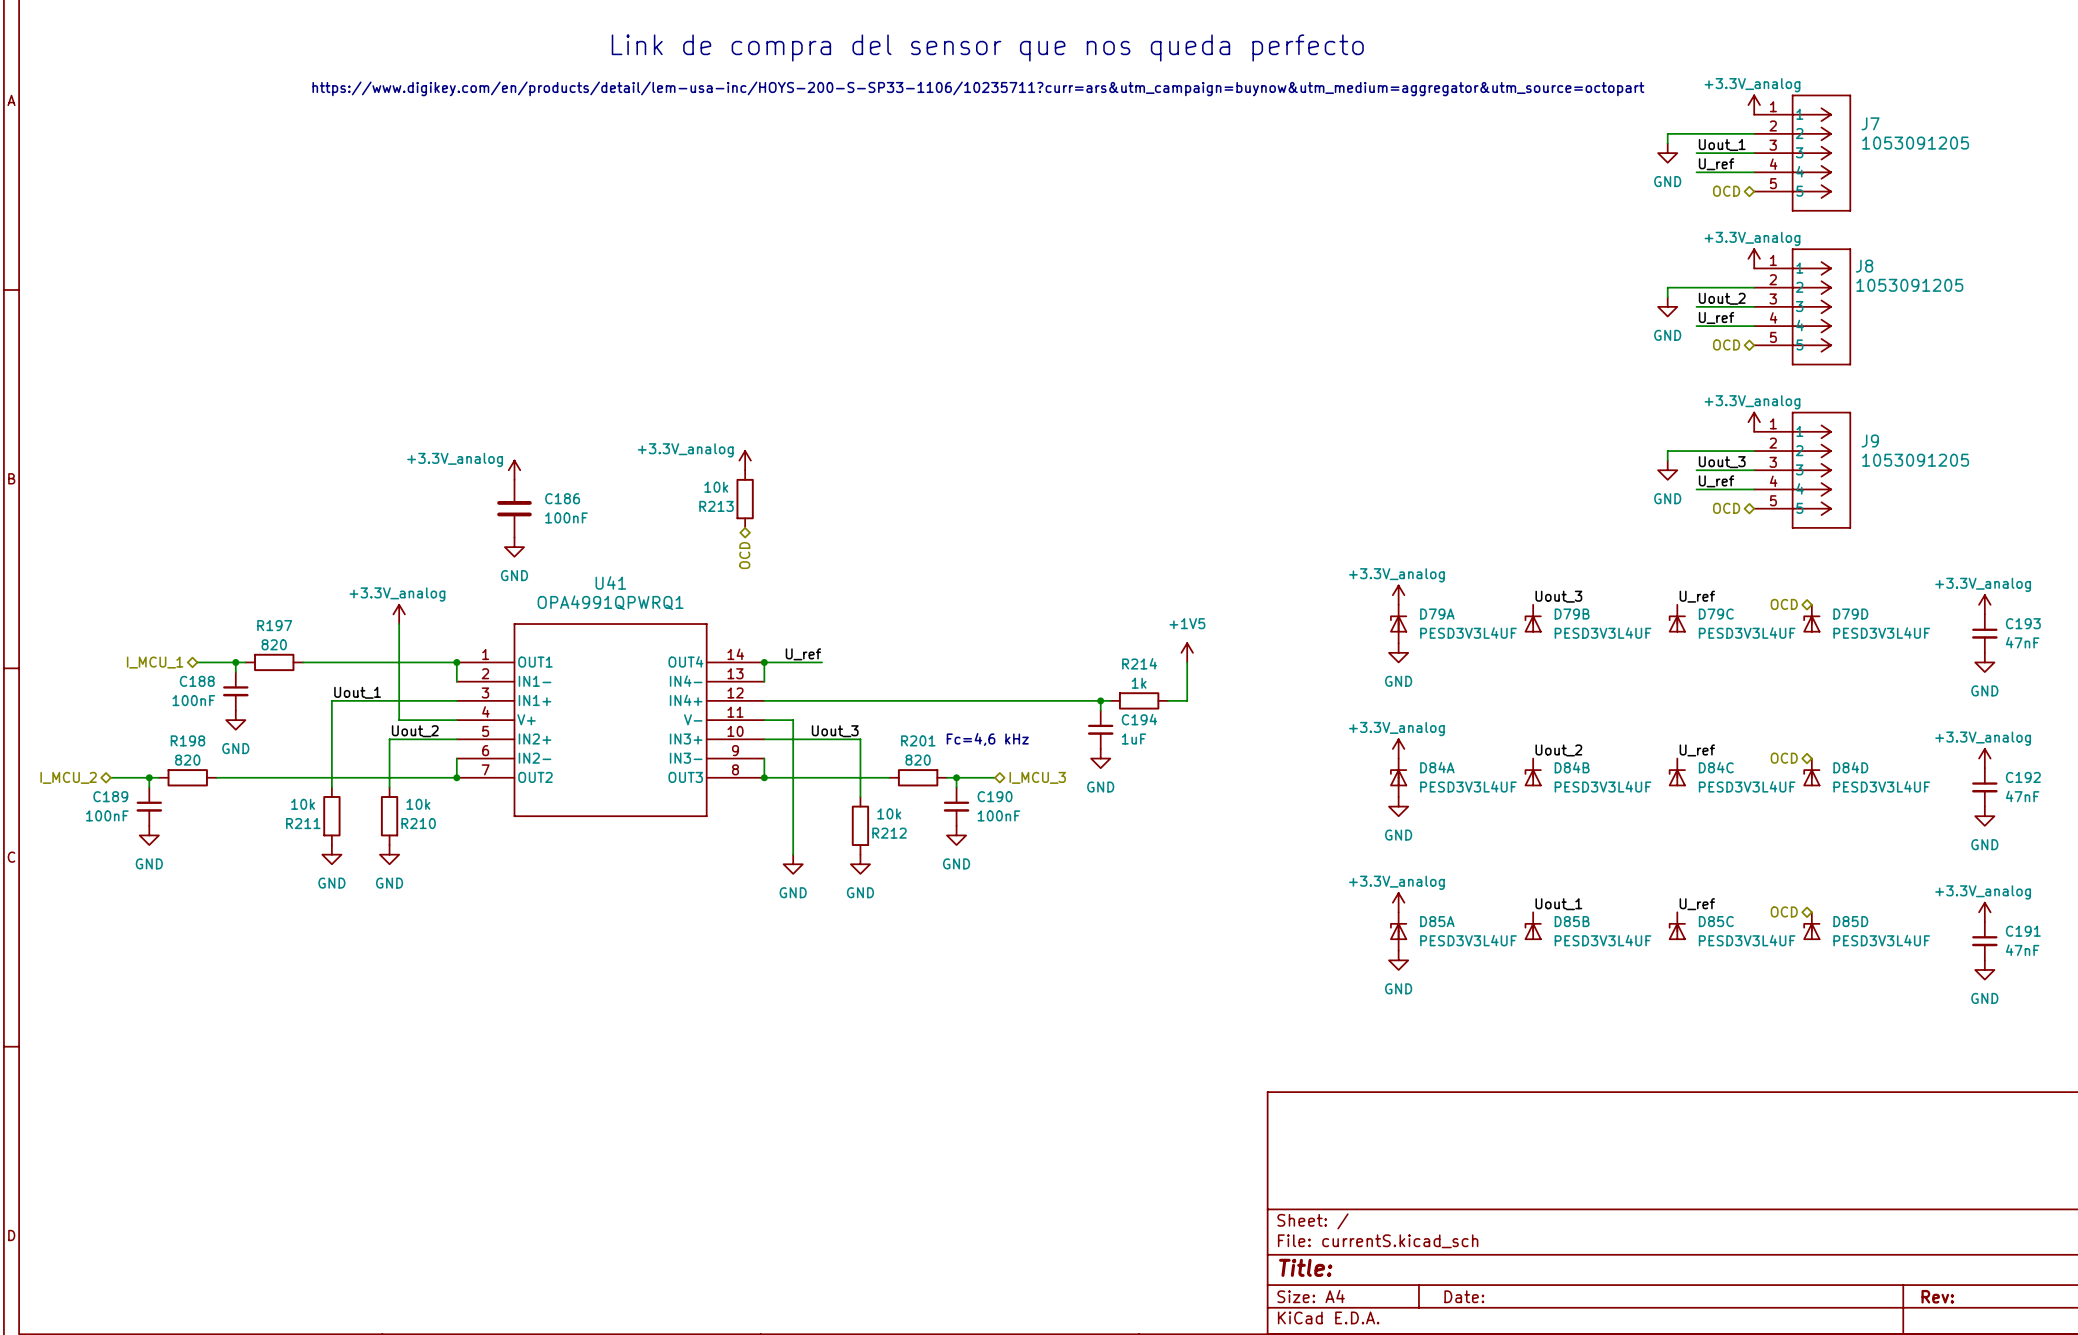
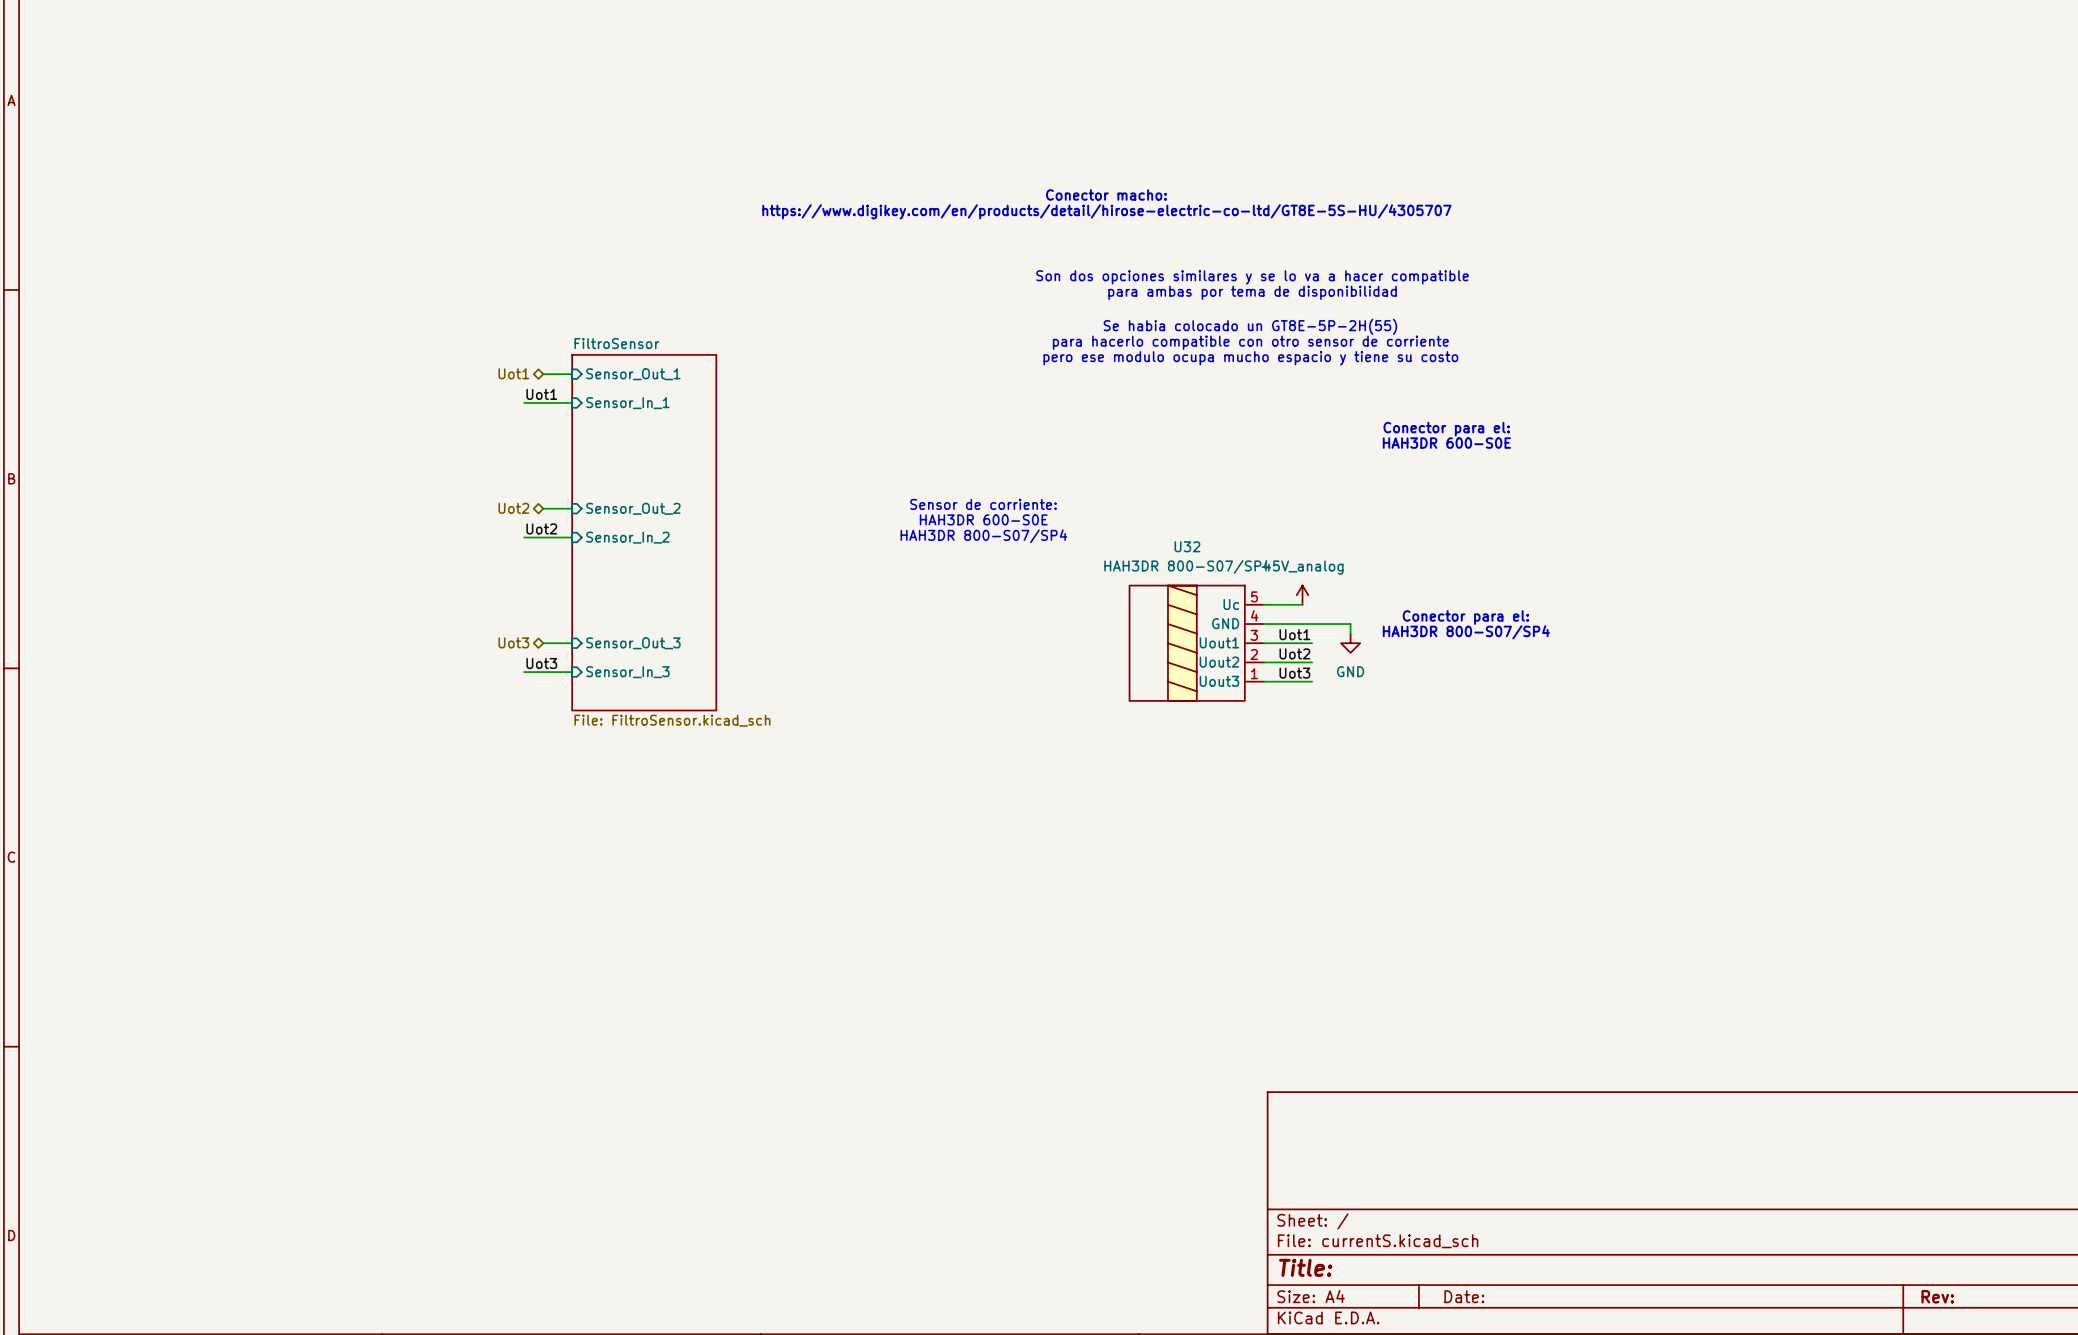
text: Link de compra del sensor que nos queda perfecto (987, 47) -> none
text: https://www.digikey.com/en/products/detail/lem-usa-inc/HOYS-200-S-SP33-1106/10235711?curr=ars&utm_campaign=buynow&utm_medium=aggregator&utm_source=octopart (978, 88) -> none
power symbol: +3.3V_analog (1754, 105) -> none
wire: (1754, 133) (1667, 133) (1667, 143) -> none
label: Uout_1 (1722, 144) -> none
power symbol: GND (1667, 153) -> none
wire: (1696, 153) (1754, 153) -> none
J7: 1053091205 (1802, 153) -> none
label: U_ref (1716, 164) -> none
wire: (1696, 172) (1754, 172) -> none
hierarchical label: OCD (1726, 191) -> none
text: none -> Conector macho: (1106, 194)
text: none -> https://www.digikey.com/en/products/detail/hirose-electric-co-ltd/GT8E-5S-HU/4305707 (1106, 211)
power symbol: +3.3V_analog (1754, 258) -> none
text: none -> Son dos opciones similares y se lo va a hacer compatible (1252, 277)
wire: (1754, 287) (1667, 287) (1667, 297) -> none
text: none -> para ambas por tema de disponibilidad (1252, 292)
label: Uout_2 (1722, 298) -> none
power symbol: GND (1667, 306) -> none
wire: (1696, 306) (1754, 306) -> none
J8: 1053091205 (1802, 306) -> none
label: U_ref (1716, 317) -> none
text: none -> Se habia colocado un GT8E-5P-2H(55) (1250, 326)
wire: (1696, 326) (1754, 326) -> none
text: none -> para hacerlo compatible con otro sensor de corriente (1250, 342)
hierarchical label: OCD (1726, 344) -> none
text: none -> pero ese modulo ocupa mucho espacio y tiene su costo (1250, 358)
hierarchical label: none -> Uot1 (513, 373)
wire: none -> (543, 374) (572, 374)
sheet pin: none -> Sensor_Out_1 (633, 374)
label: none -> Uot1 (541, 394)
wire: none -> (524, 402) (572, 402)
sheet pin: none -> Sensor_In_1 (627, 403)
power symbol: +3.3V_analog (1754, 422) -> none
text: none -> Conector para el: (1446, 429)
text: none -> HAH3DR 600-S0E (1446, 443)
wire: (1754, 451) (1667, 451) (1667, 460) -> none
power symbol: +3.3V_analog (745, 460) -> none
label: Uout_3 (1722, 462) -> none
power symbol: +3.3V_analog (514, 470) -> none
power symbol: GND (1667, 470) -> none
wire: (1696, 470) (1754, 470) -> none
J9: 1053091205 (1802, 470) -> none
label: U_ref (1716, 481) -> none
wire: (1696, 489) (1754, 489) -> none
R213: 10k (745, 499) -> none
text: none -> Sensor de corriente: (983, 504)
hierarchical label: none -> Uot2 (513, 508)
C186: 100nF (514, 508) -> none
wire: none -> (543, 508) (572, 508)
sheet pin: none -> Sensor_Out_2 (633, 508)
hierarchical label: OCD (1726, 508) -> none
text: none -> HAH3DR 600-S0E (983, 519)
label: none -> Uot2 (541, 528)
sheet FiltroSensor: none -> File: FiltroSensor.kicad_sch (644, 532)
text: none -> HAH3DR 800-S07/SP4 (983, 536)
wire: none -> (524, 537) (572, 537)
sheet pin: none -> Sensor_In_2 (627, 537)
power symbol: GND (514, 547) -> none
hierarchical label: OCD (744, 555) -> none
power symbol: none -> +5V_analog (1302, 595)
power symbol: +3.3V_analog (1398, 595) -> none
label: Uout_3 (1558, 596) -> none
label: U_ref (1697, 596) -> none
wire: none -> (1264, 604) (1302, 604)
hierarchical label: OCD (1784, 604) -> none
power symbol: +3.3V_analog (1984, 604) -> none
power symbol: +3.3V_analog (399, 614) -> none
text: none -> Conector para el: (1465, 617)
D79B: PESD3V3L4UF (1533, 618) -> none
D79C: PESD3V3L4UF (1677, 618) -> none
D79D: PESD3V3L4UF (1811, 618) -> none
wire: (399, 624) (399, 720) (456, 720) -> none
wire: none -> (1264, 624) (1350, 624) (1350, 633)
D79A: PESD3V3L4UF (1398, 624) -> none
text: none -> HAH3DR 800-S07/SP4 (1466, 632)
C193: 47nF (1984, 633) -> none
label: none -> Uot1 (1294, 634)
hierarchical label: none -> Uot3 (513, 642)
wire: none -> (543, 643) (572, 643)
sheet pin: none -> Sensor_Out_3 (633, 643)
U32: none -> HAH3DR 800-S07/SP4 (1196, 643)
wire: none -> (1264, 643) (1312, 643)
power symbol: +1V5 (1187, 652) -> none
power symbol position: GND (1398, 652) -> GND (1350, 643)
label: none -> Uot2 (1294, 653)
label: U_ref (803, 654) -> none
hierarchical label: I_MCU_1 (155, 662) -> none
wire: (197, 662) (245, 662) -> none
wire: (235, 662) (235, 672) -> none
junction: (235, 662) -> none
R197: 820 (274, 662) -> none
wire: (303, 662) (456, 662) (456, 681) -> none
junction: (456, 662) -> none
junction: (764, 662) -> none
wire: (822, 662) (764, 662) (764, 681) -> none
wire: none -> (1264, 662) (1312, 662)
power symbol: GND (1984, 662) -> none
label: none -> Uot3 (541, 663)
wire: none -> (524, 672) (572, 672)
sheet pin: none -> Sensor_In_3 (627, 672)
label: none -> Uot3 (1294, 673)
wire: none -> (1264, 681) (1312, 681)
C188: 100nF (235, 691) -> none
label: Uout_1 (357, 692) -> none
wire: (456, 700) (331, 700) (331, 787) -> none
wire: (764, 700) (1110, 700) -> none
wire: (1100, 700) (1100, 710) -> none
junction: (1100, 700) -> none
R214: 1k (1139, 700) -> none
power symbol: GND (235, 720) -> none
U41: OPA4991QPWRQ1 (610, 720) -> none
wire: (764, 720) (793, 720) (793, 854) -> none
C194: 1uF (1100, 729) -> none
label: Uout_2 (415, 731) -> none
label: Uout_3 (835, 731) -> none
wire: (456, 739) (389, 739) (389, 787) -> none
wire: (764, 739) (860, 739) (860, 796) -> none
text: Fc=4,6 kHz (987, 739) -> none
power symbol: +3.3V_analog (1398, 748) -> none
label: Uout_2 (1558, 750) -> none
label: U_ref (1697, 750) -> none
wire: (456, 758) (456, 777) (216, 777) -> none
wire: (764, 758) (764, 777) (889, 777) -> none
power symbol: GND (1100, 758) -> none
hierarchical label: OCD (1784, 758) -> none
power symbol: +3.3V_analog (1984, 758) -> none
D84B: PESD3V3L4UF (1533, 772) -> none
D84C: PESD3V3L4UF (1677, 772) -> none
D84D: PESD3V3L4UF (1811, 772) -> none
hierarchical label: I_MCU_2 (68, 777) -> none
wire: (110, 777) (158, 777) -> none
wire: (149, 777) (149, 787) -> none
junction: (149, 777) -> none
R198: 820 (187, 777) -> none
junction: (456, 777) -> none
junction: (764, 777) -> none
R201: 820 (918, 777) -> none
wire: (946, 777) (994, 777) -> none
wire: (956, 777) (956, 787) -> none
junction: (956, 777) -> none
hierarchical label: I_MCU_3 (1037, 777) -> none
D84A: PESD3V3L4UF (1398, 777) -> none
C192: 47nF (1984, 787) -> none
C189: 100nF (149, 806) -> none
C190: 100nF (956, 806) -> none
power symbol: GND (1398, 806) -> none
R211: 10k (331, 816) -> none
R210: 10k (389, 816) -> none
power symbol: GND (1984, 816) -> none
R212: 10k (860, 825) -> none
power symbol: GND (149, 835) -> none
power symbol: GND (956, 835) -> none
power symbol: GND (331, 854) -> none
power symbol: GND (389, 854) -> none
power symbol: GND (793, 864) -> none
power symbol: GND (860, 864) -> none
power symbol: +3.3V_analog (1398, 902) -> none
label: Uout_1 (1558, 904) -> none
label: U_ref (1697, 904) -> none
hierarchical label: OCD (1784, 911) -> none
power symbol: +3.3V_analog (1984, 912) -> none
D85B: PESD3V3L4UF (1533, 925) -> none
D85C: PESD3V3L4UF (1677, 925) -> none
D85D: PESD3V3L4UF (1811, 925) -> none
D85A: PESD3V3L4UF (1398, 931) -> none
C191: 47nF (1984, 941) -> none
power symbol: GND (1398, 960) -> none
power symbol: GND (1984, 969) -> none

